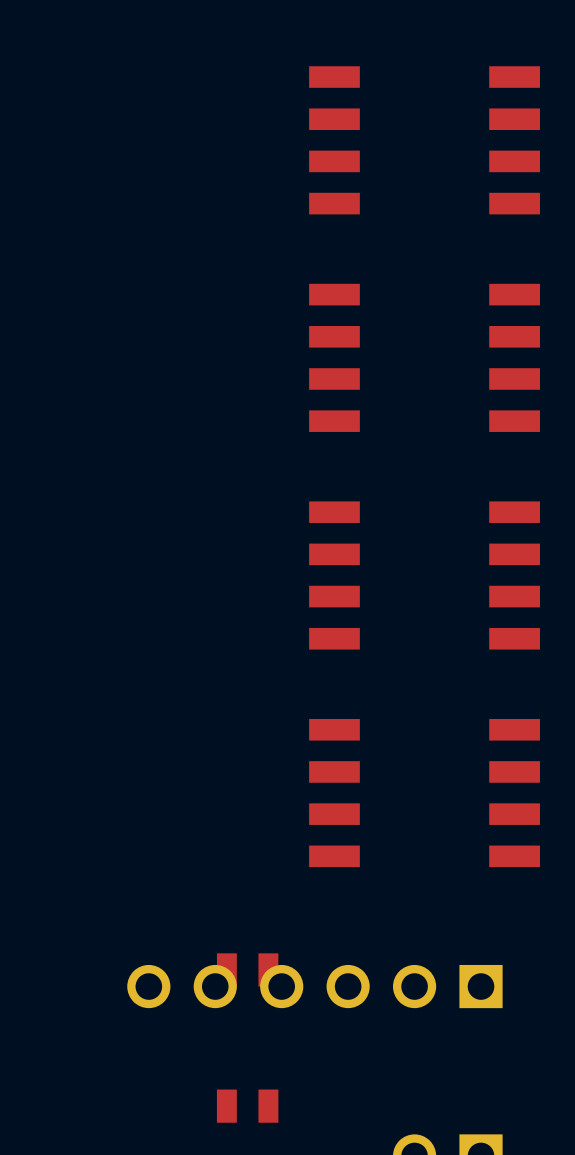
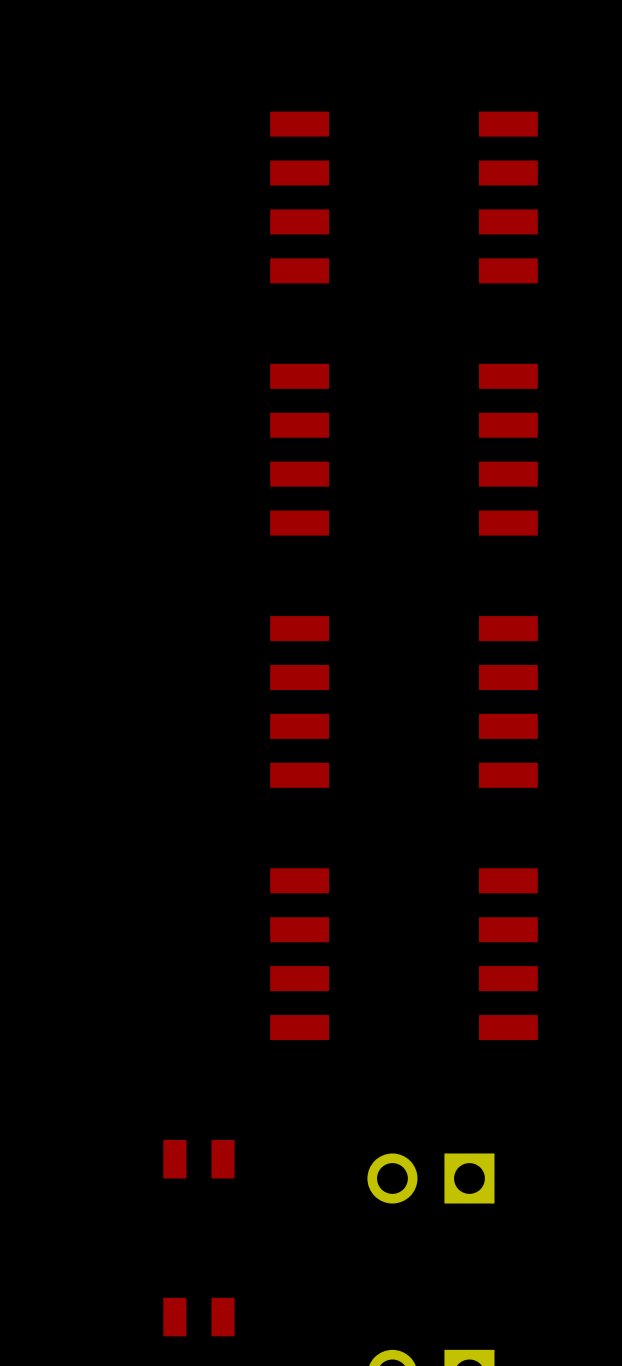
part: (314, 986) -> none

